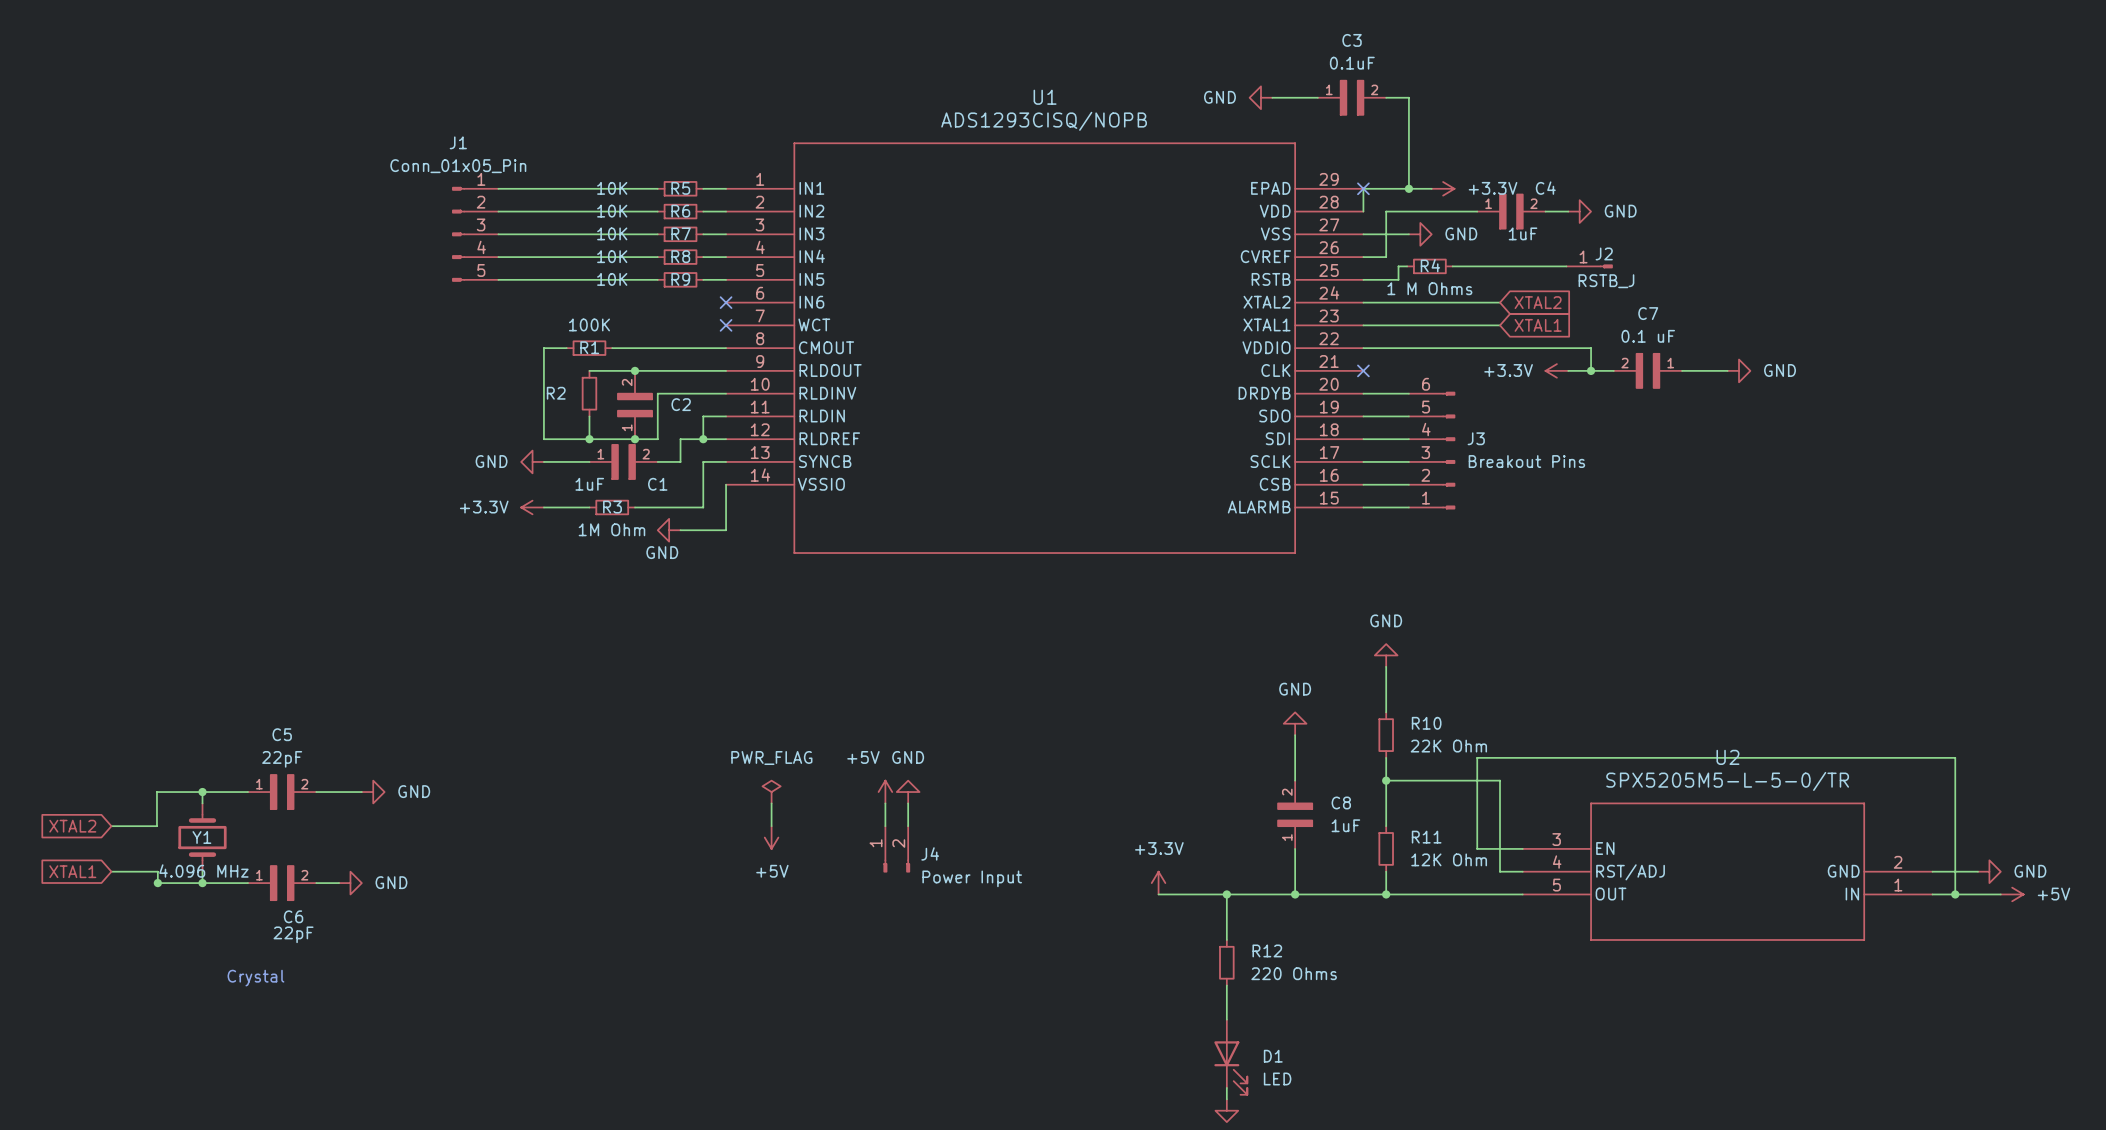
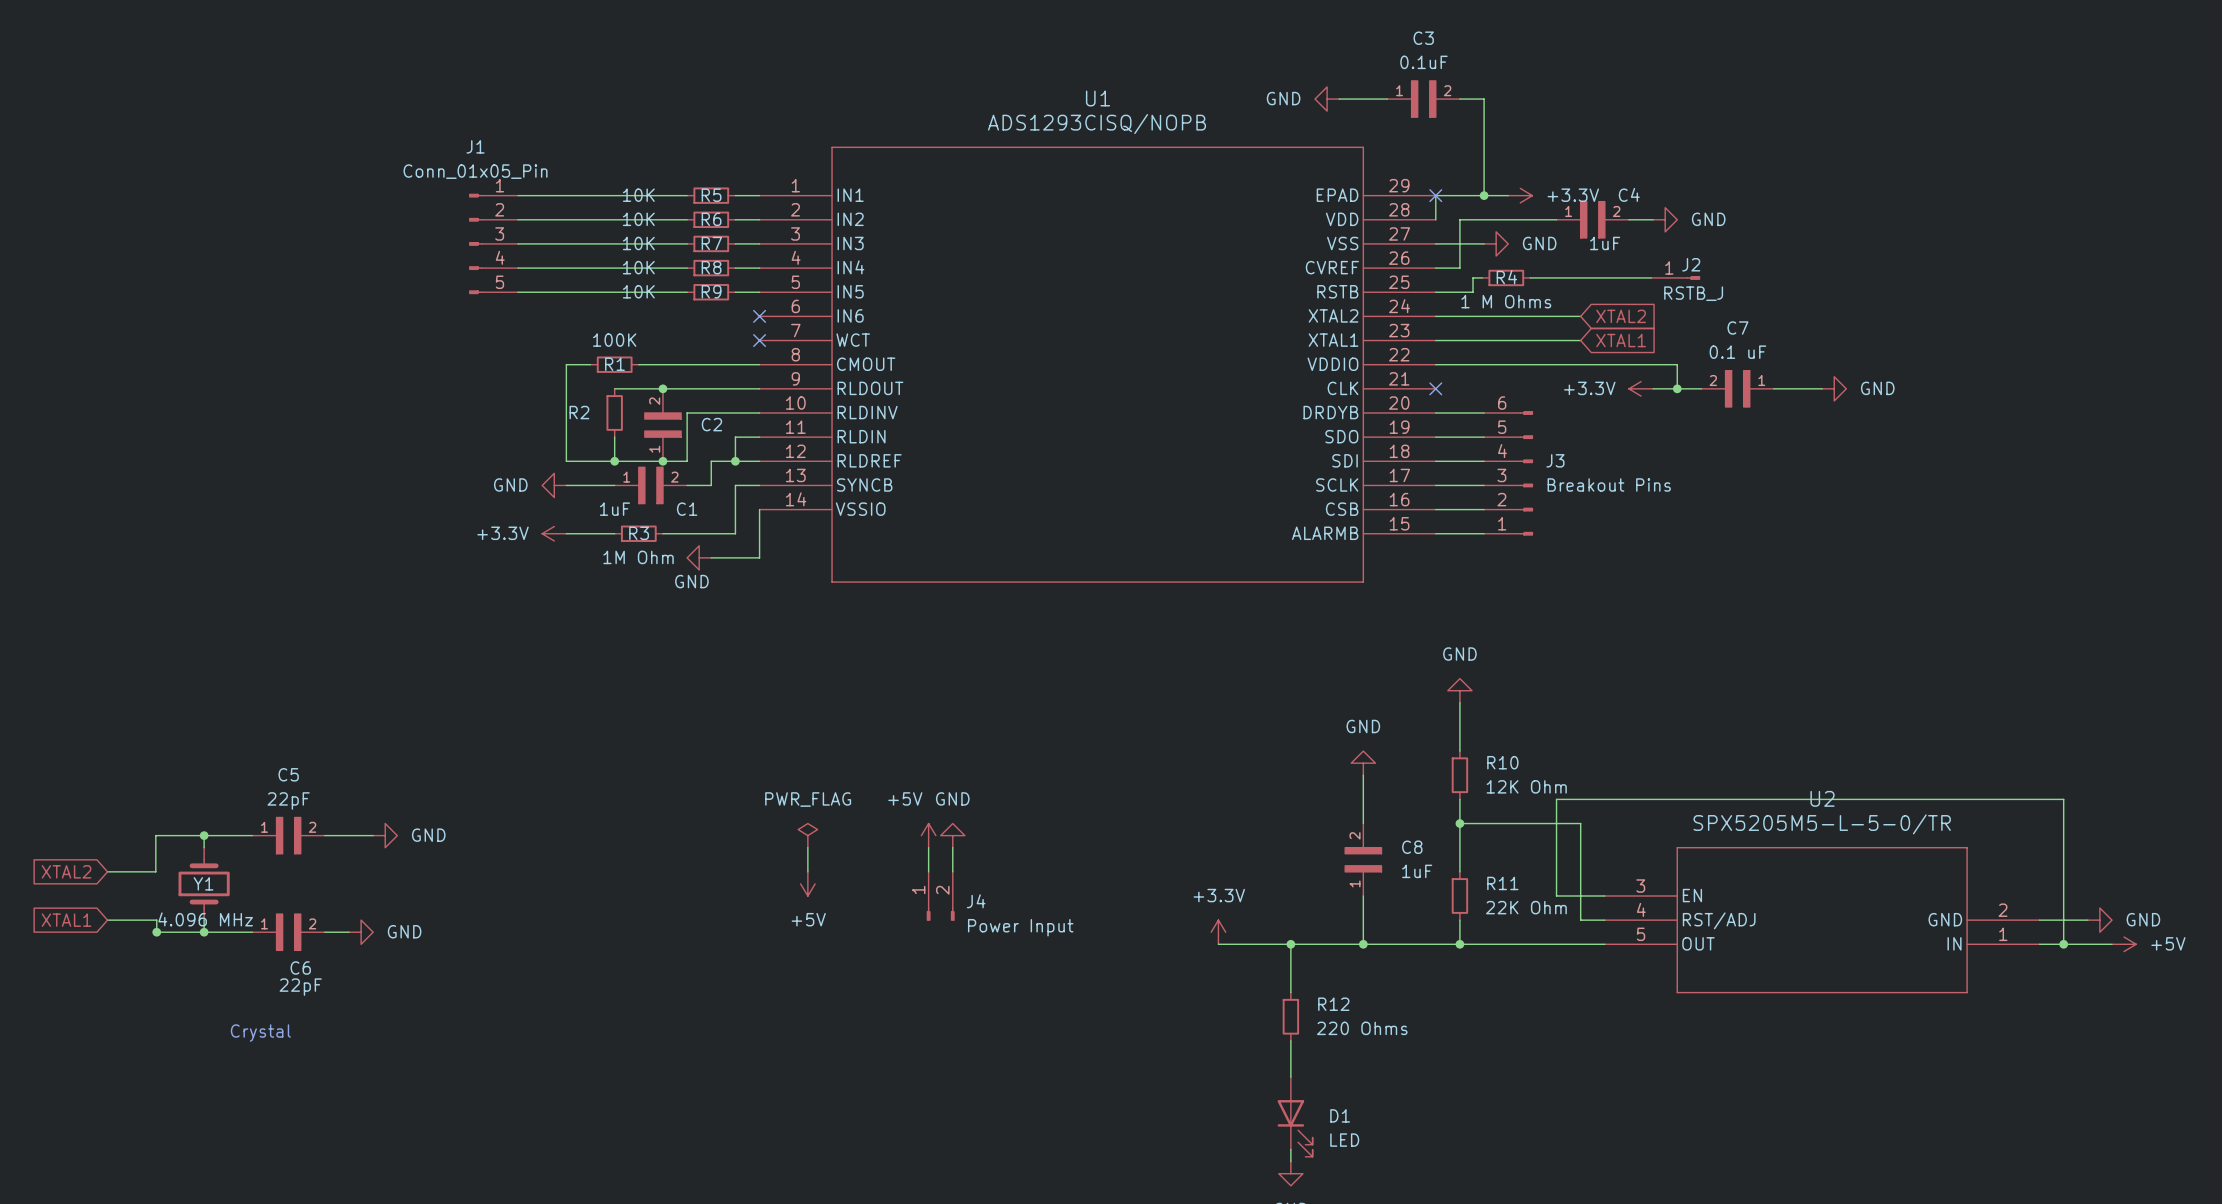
R10 value: 22K Ohm (1448, 746) -> 12K Ohm (1526, 786)
R11 value: 12K Ohm (1449, 859) -> 22K Ohm (1526, 907)

